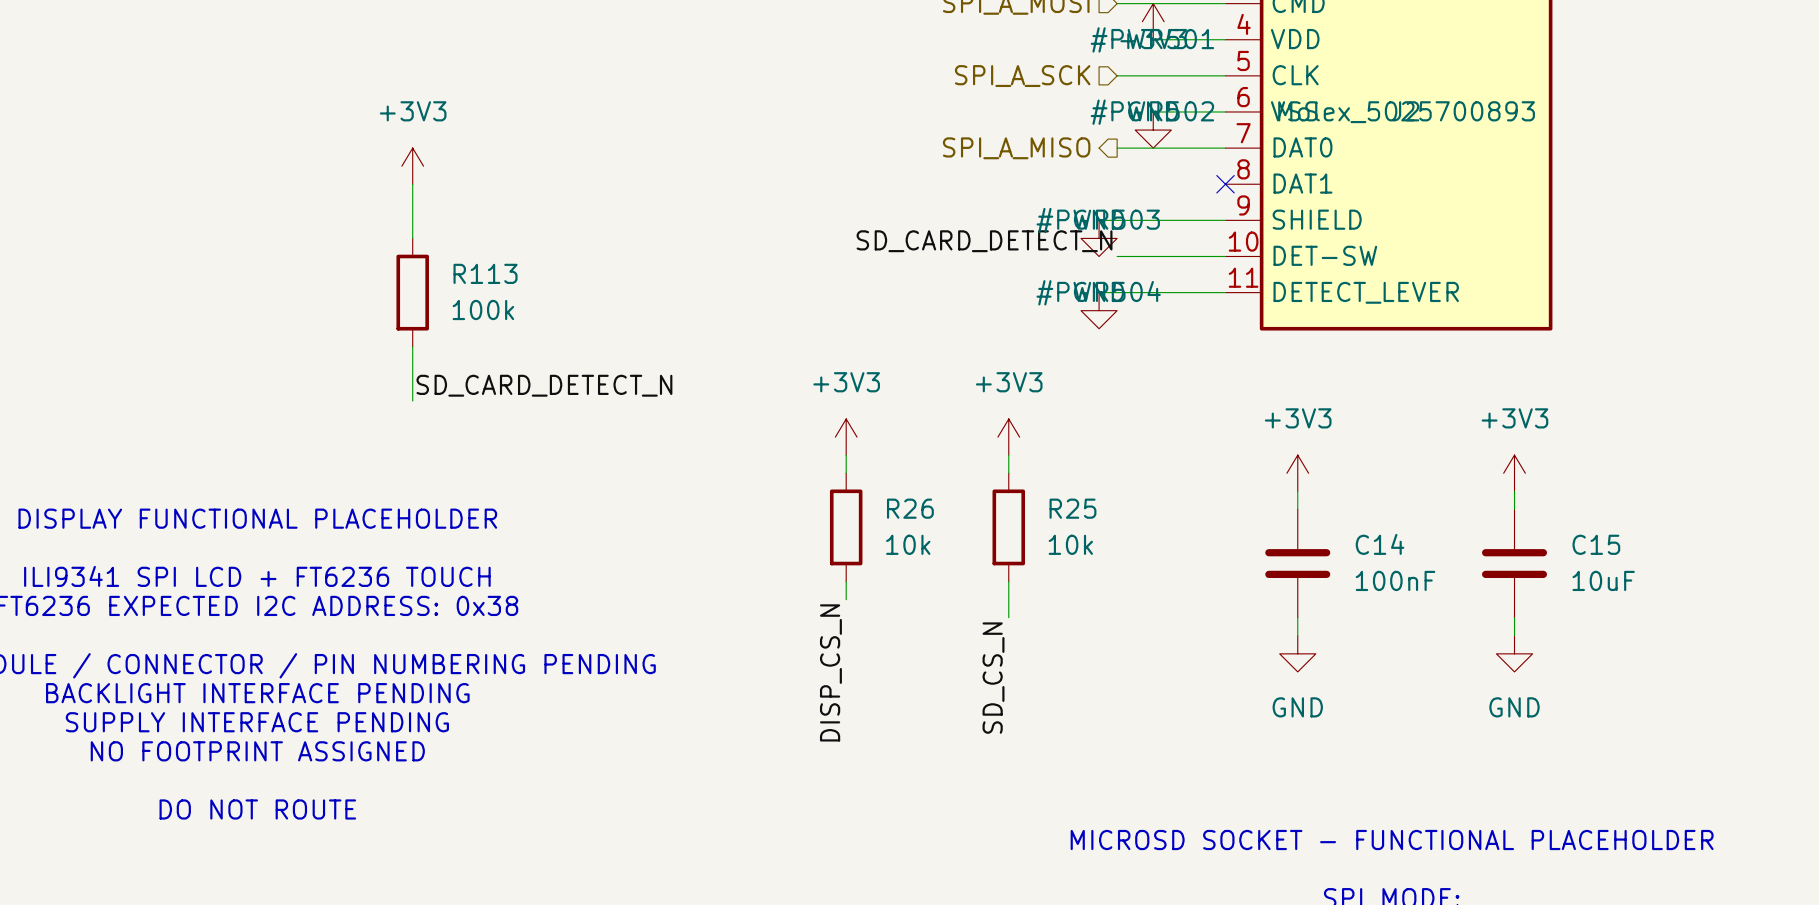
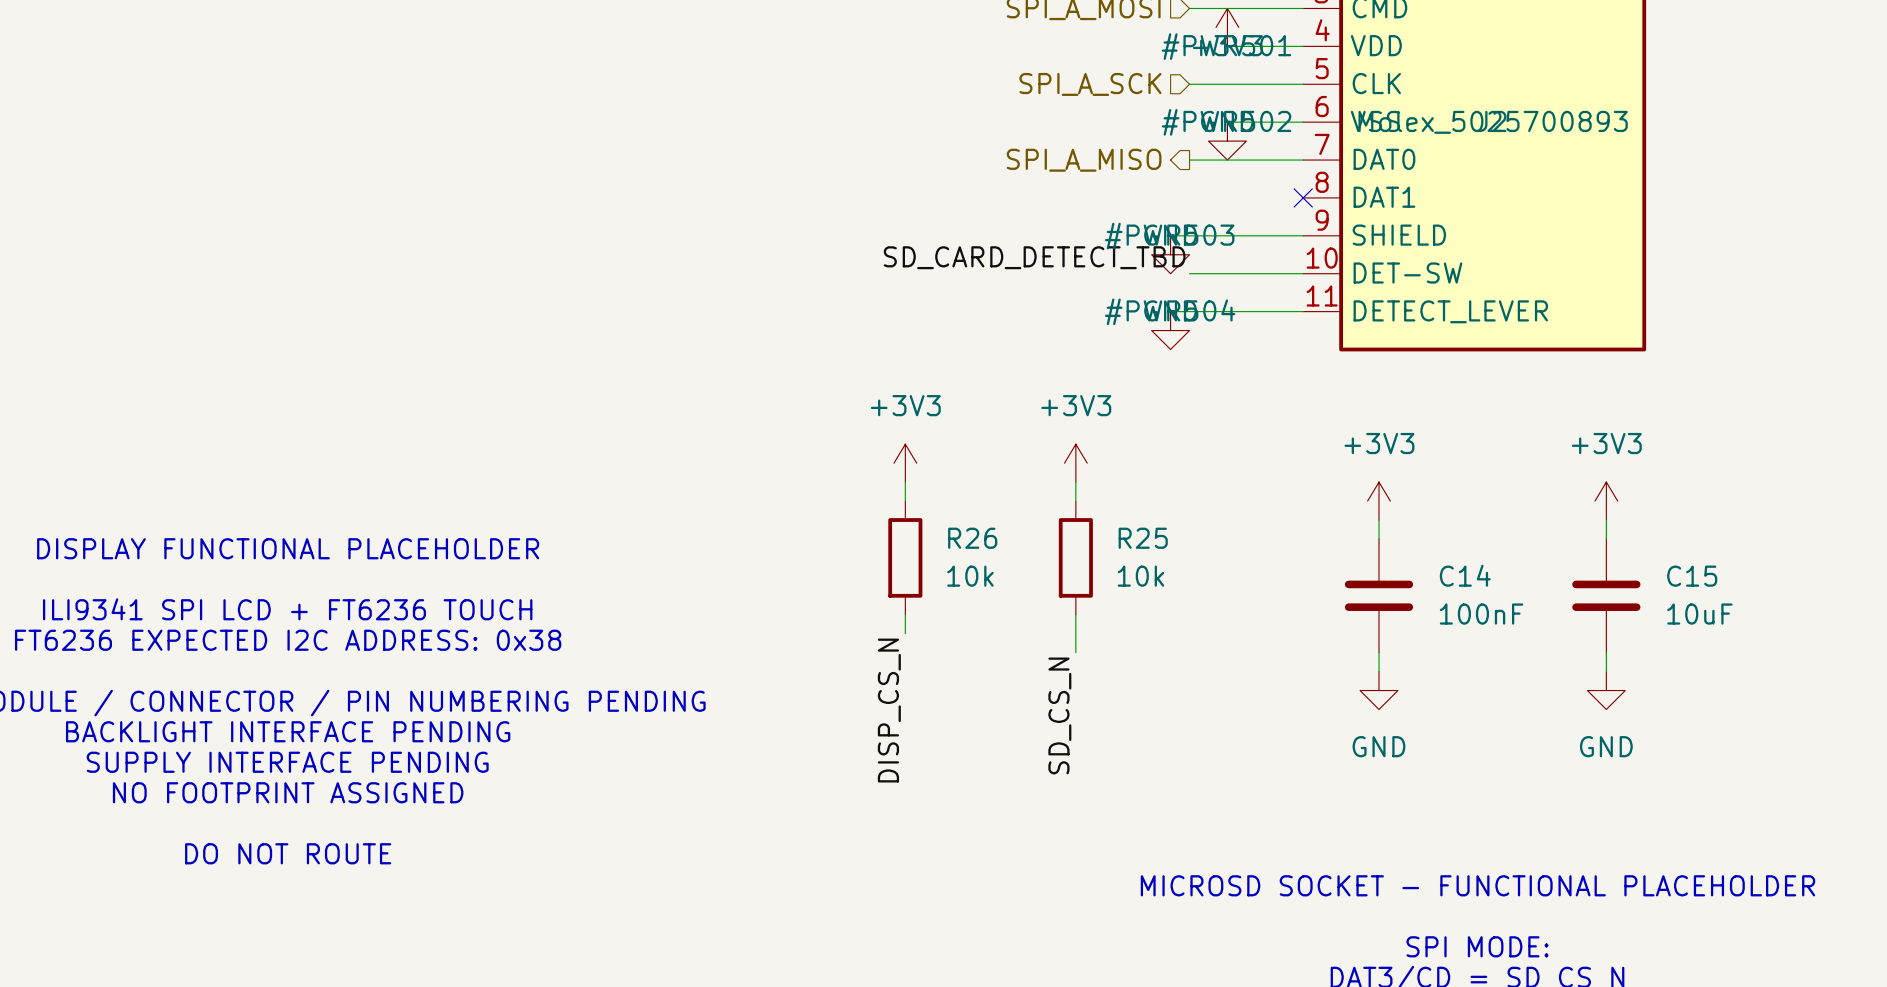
power symbol: +3V3 (412, 166) -> none
wire: (412, 184) (412, 238) -> none
label: SD_CARD_DETECT_N (984, 241) -> SD_CARD_DETECT_TBD (1034, 257)
R113: 100k (412, 292) -> none
wire: (412, 346) (412, 400) -> none
label: SD_CARD_DETECT_N (544, 385) -> none

